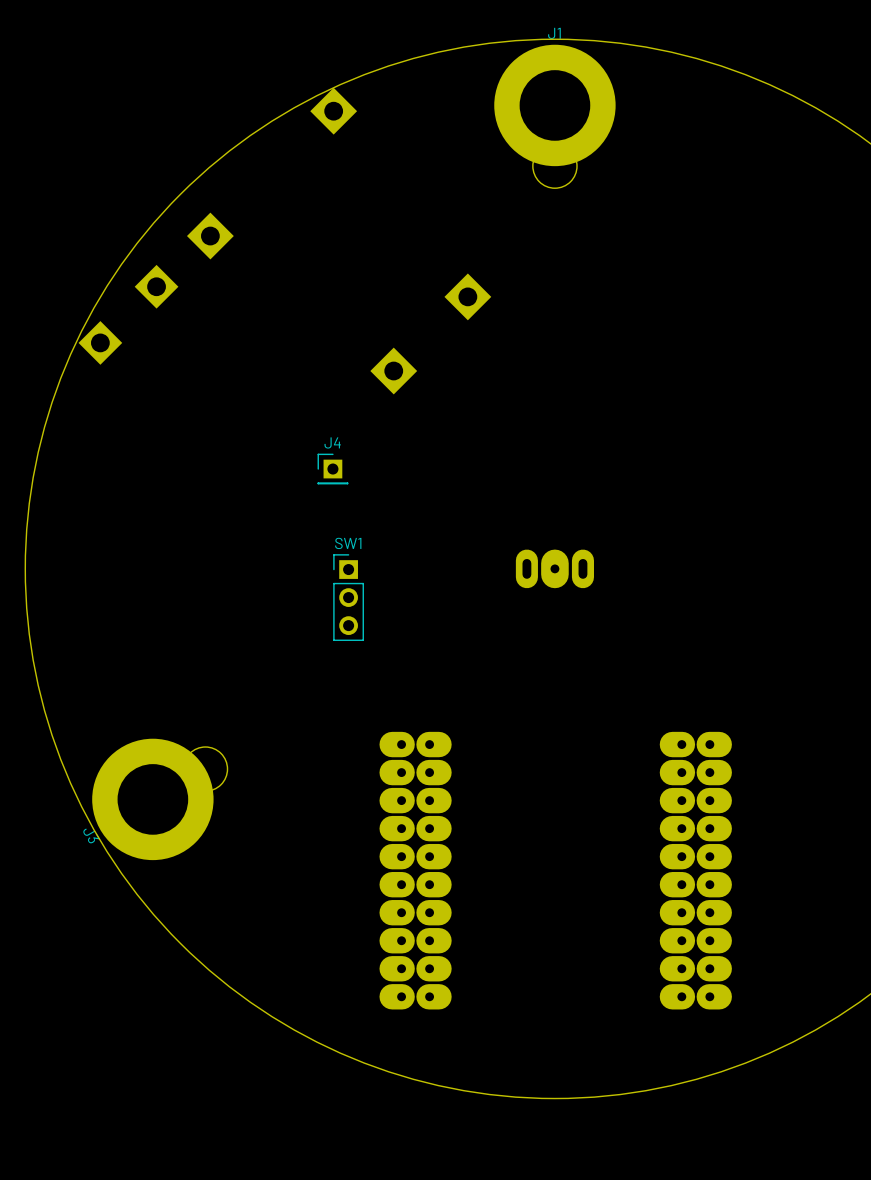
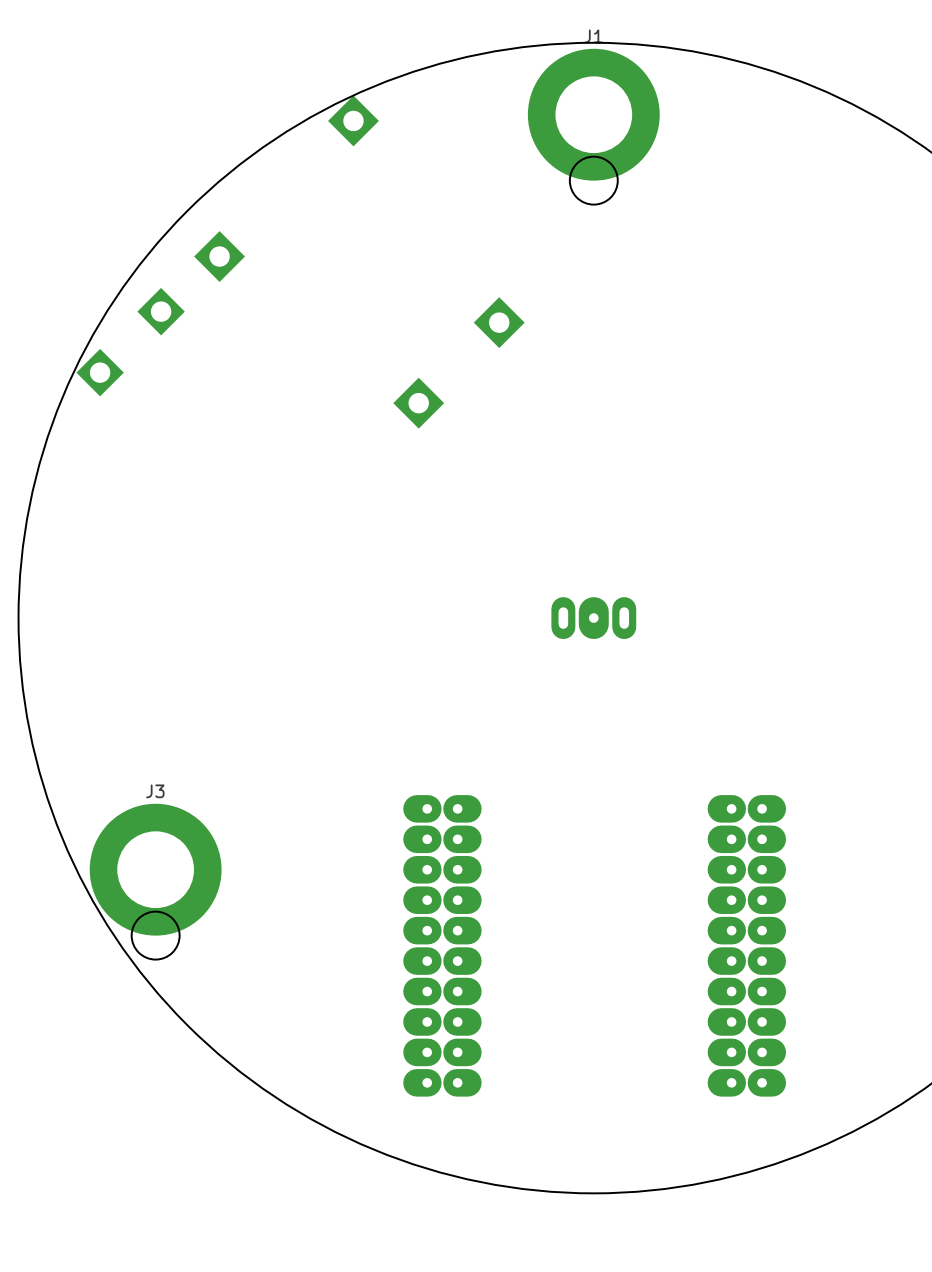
J4: (332, 469) -> none
SW1: (348, 597) -> none
J3 rotation: 0° (159, 799) -> 120° clockwise (155, 881)

